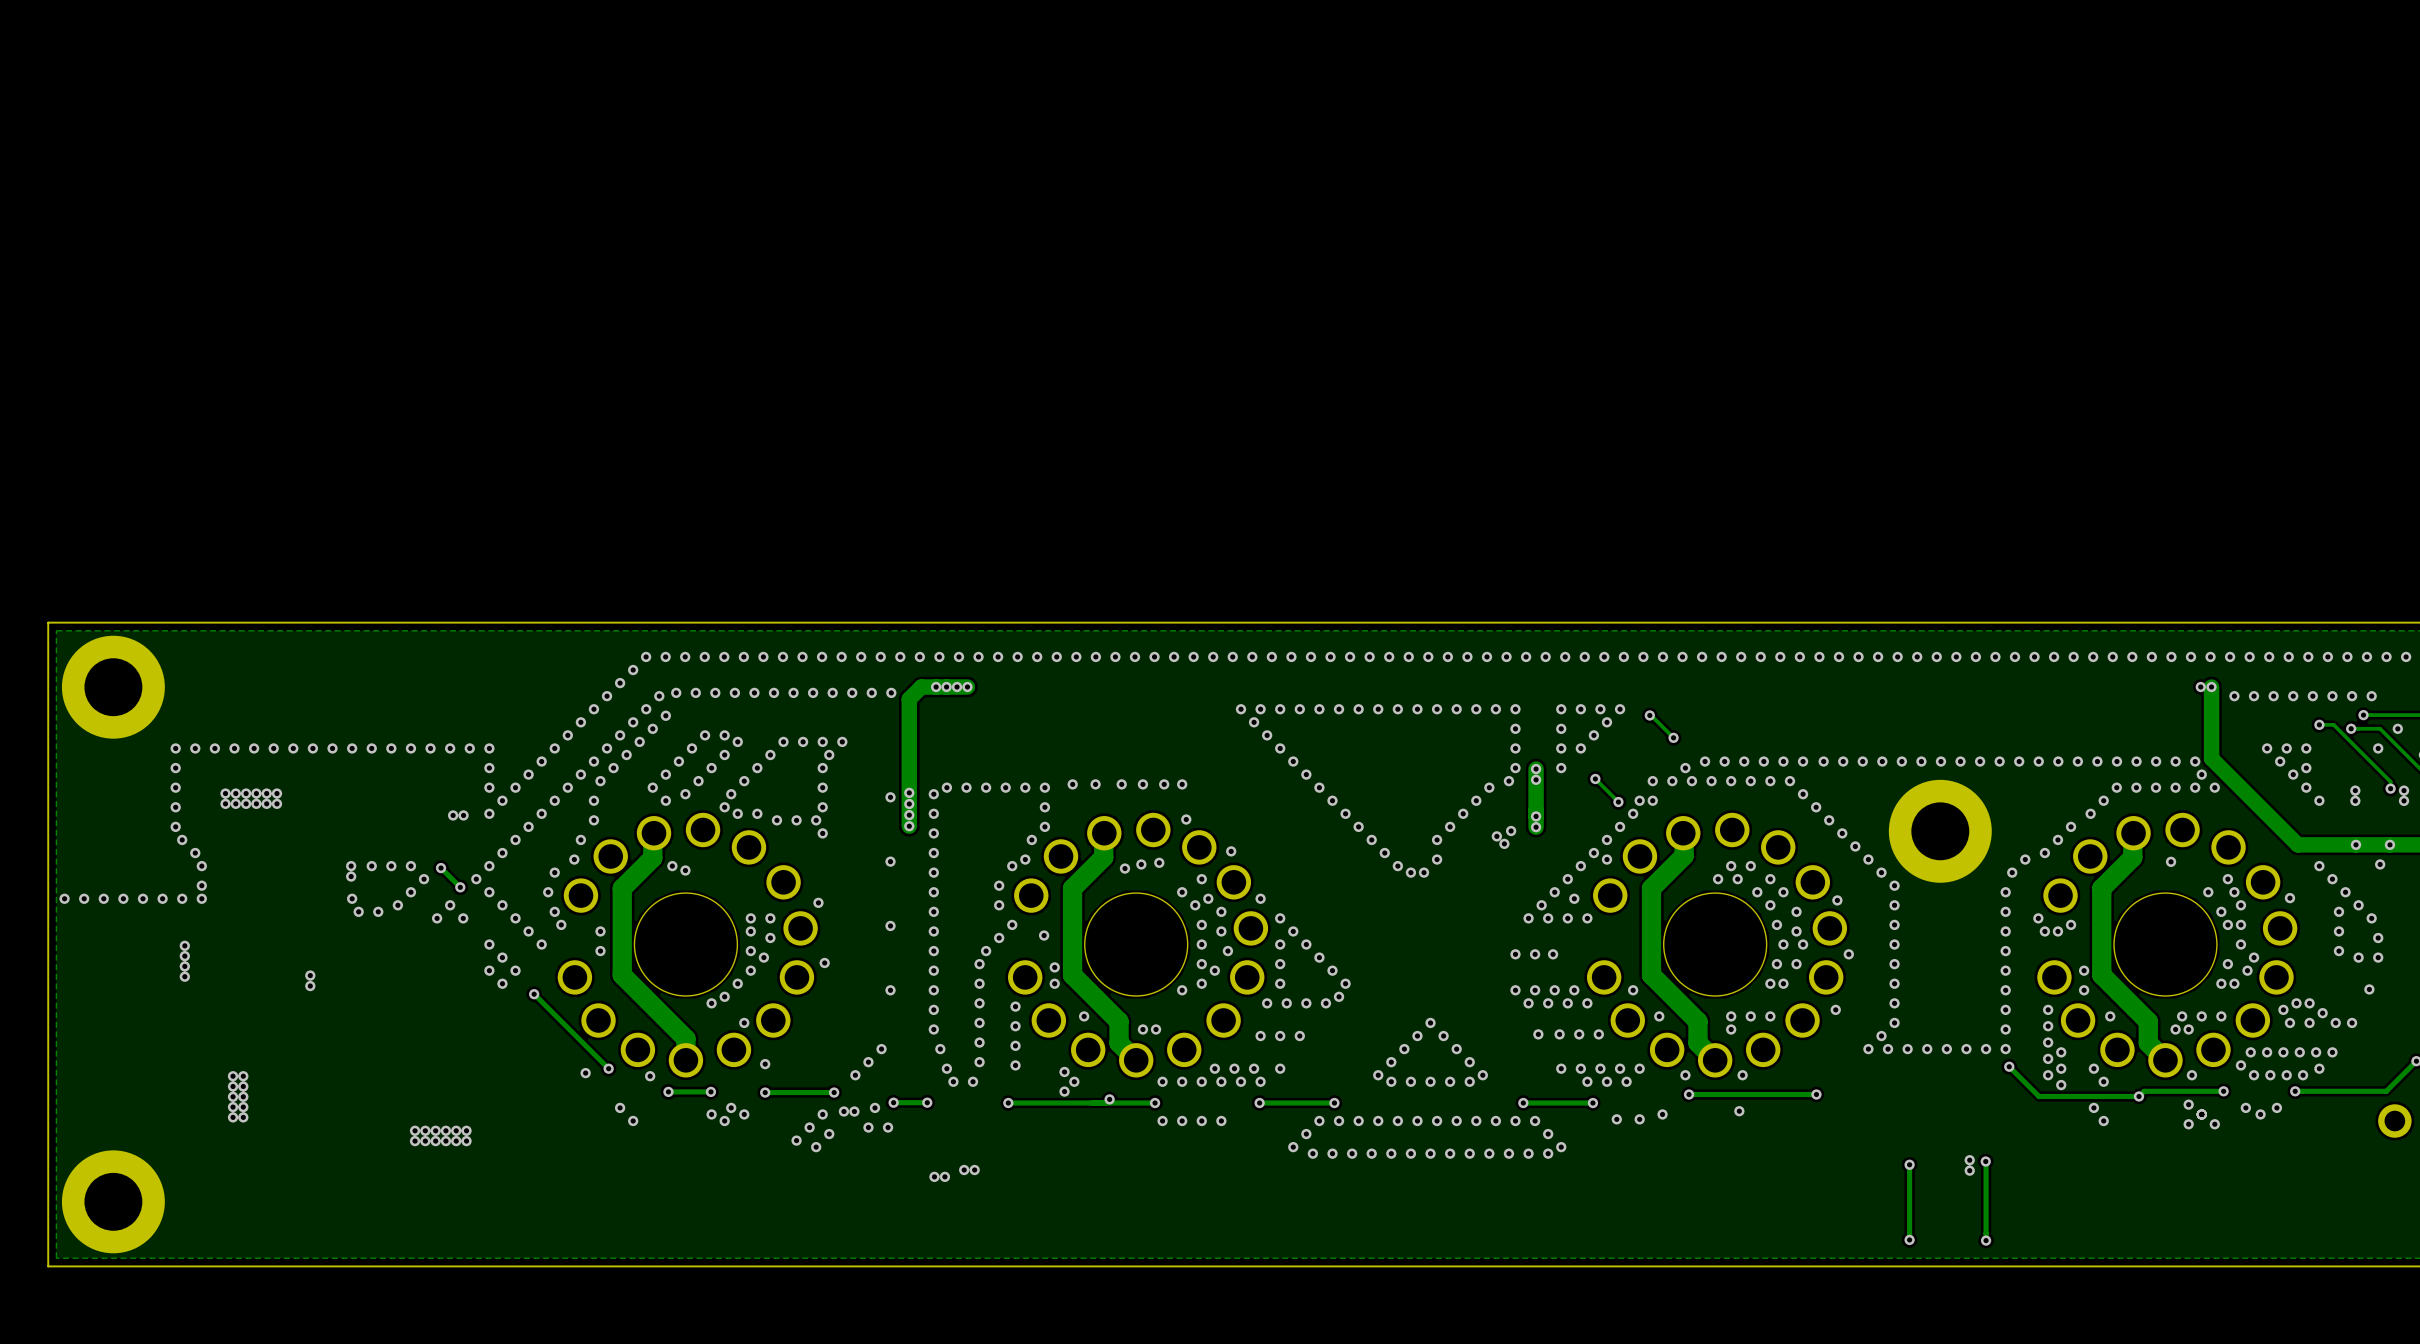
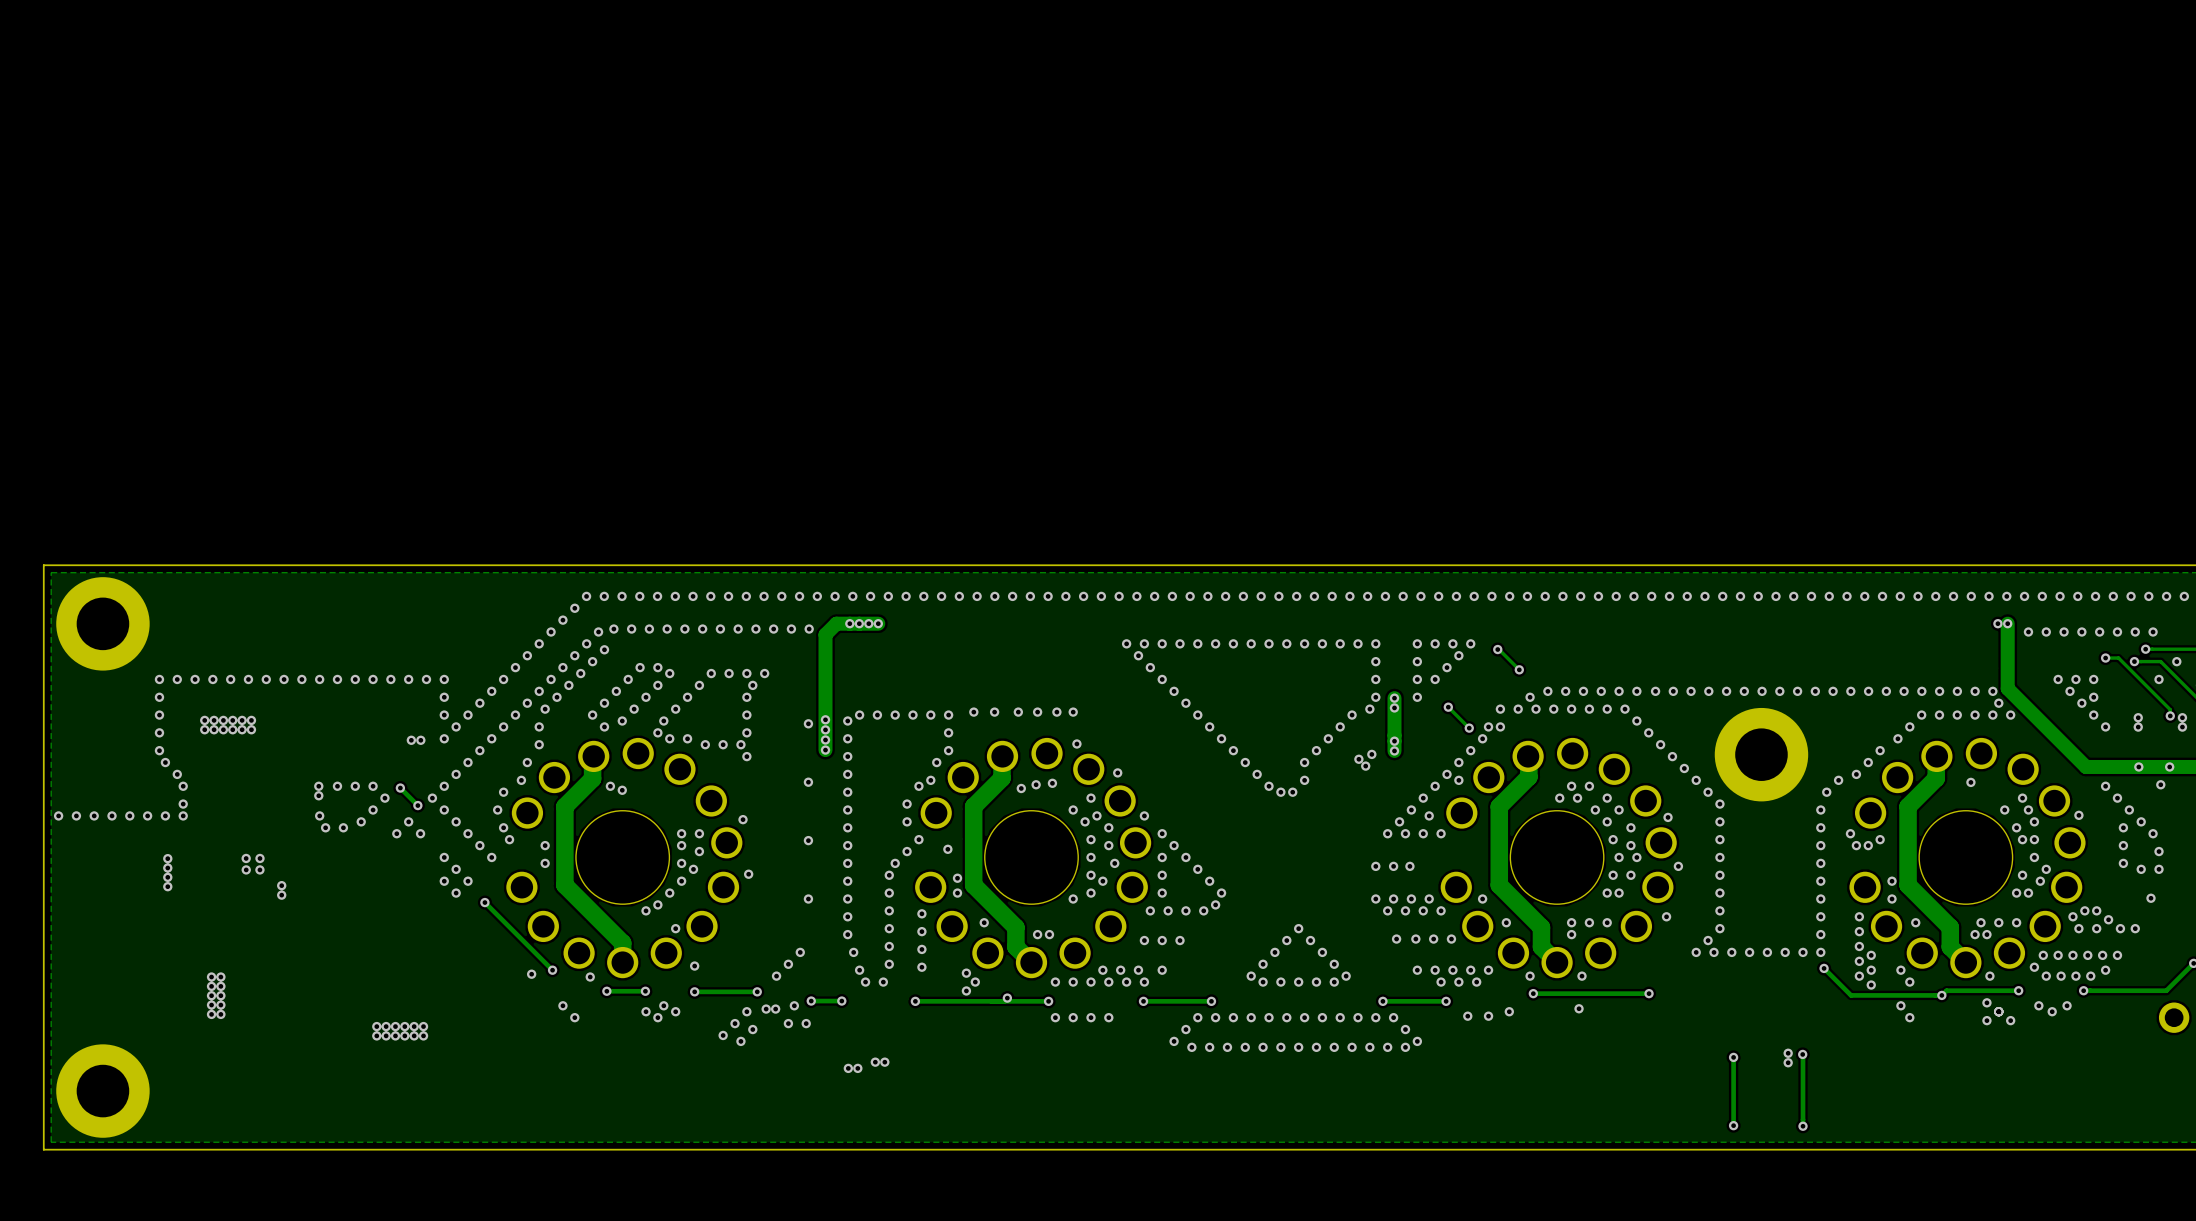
via: none -> (246, 858)
via: none -> (259, 858)
via: none -> (246, 869)
via: none -> (259, 869)

